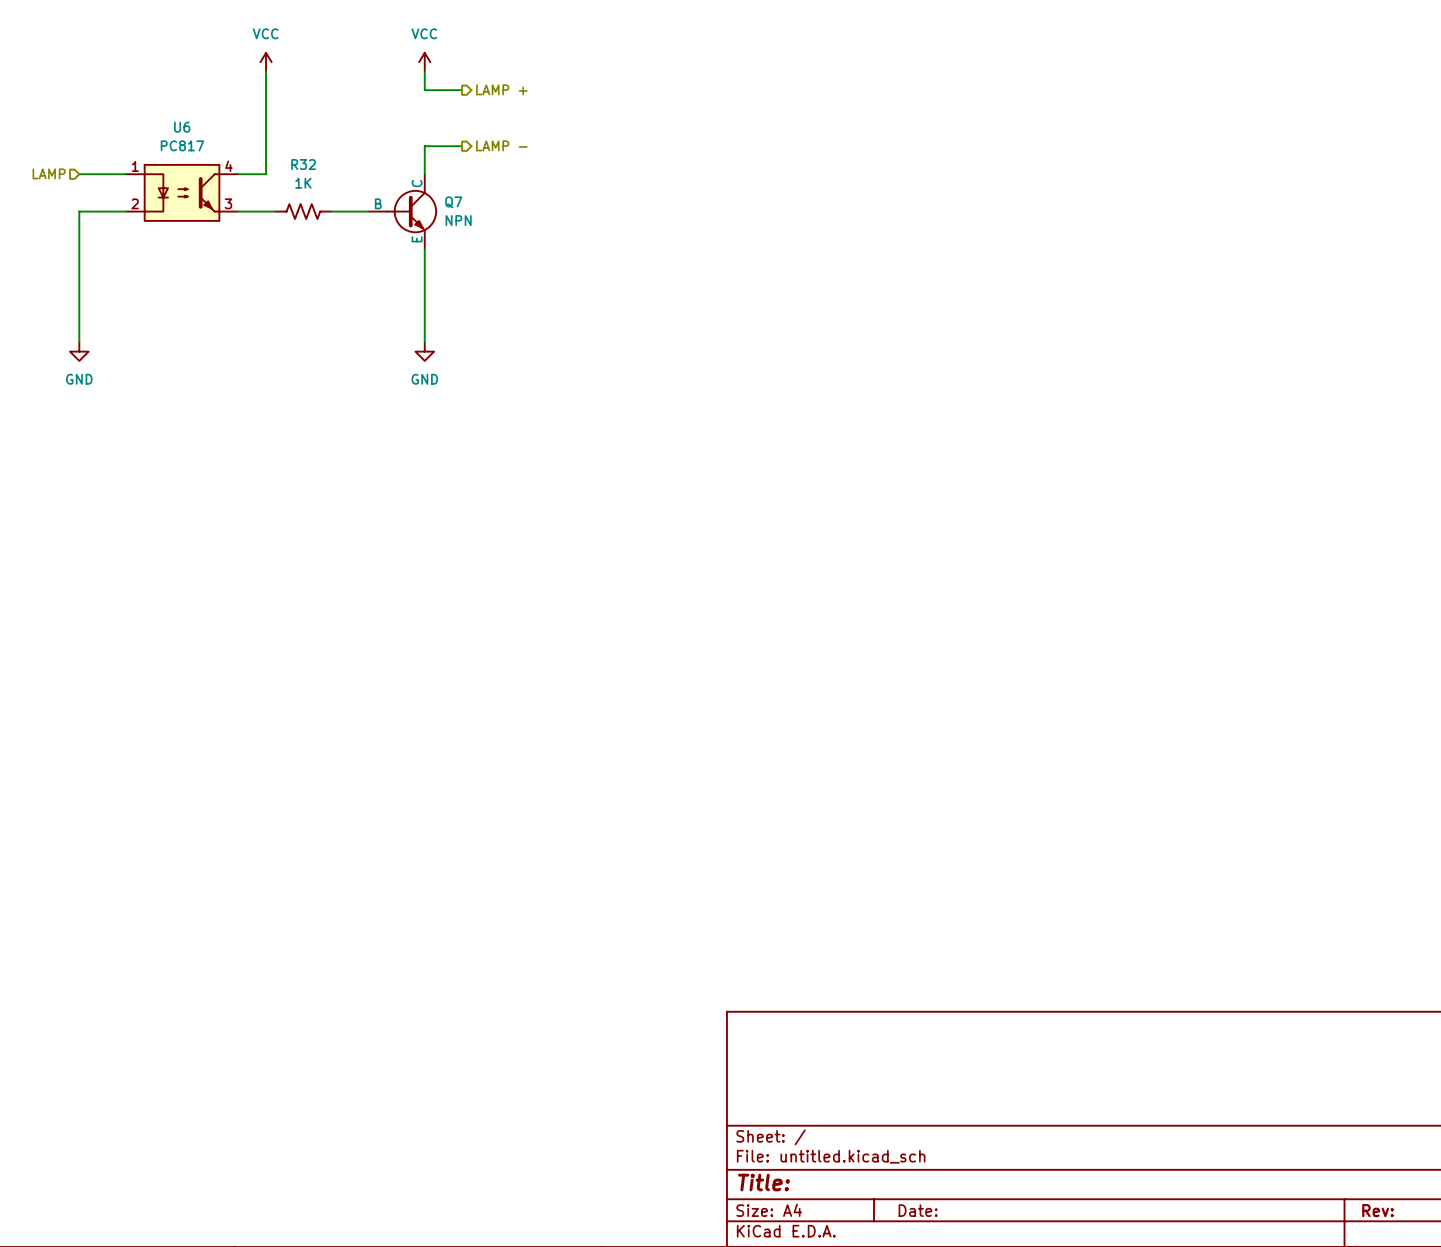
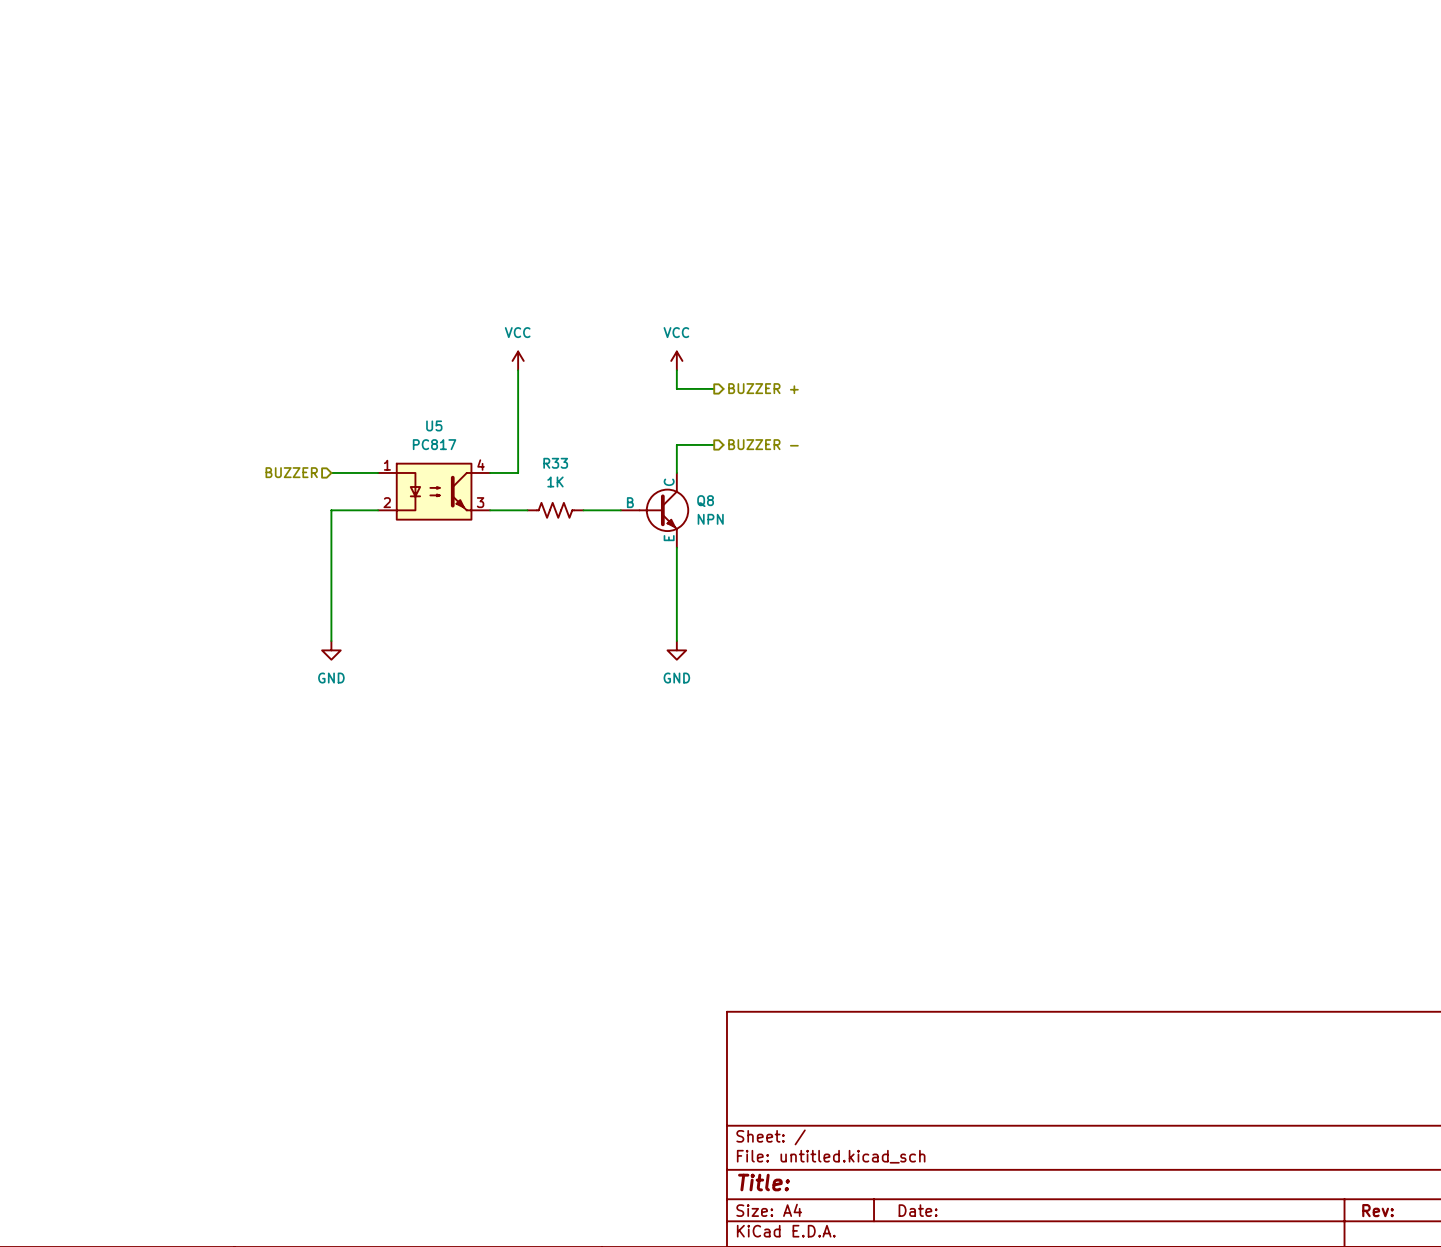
power symbol: VCC (266, 62) -> none
power symbol: VCC (424, 62) -> none
wire: (266, 71) (266, 174) (238, 174) -> none
wire: (424, 71) (424, 90) (462, 90) -> none
hierarchical label: LAMP + (501, 89) -> none
hierarchical label: LAMP - (501, 145) -> none
wire: (462, 146) (424, 146) (424, 174) -> none
hierarchical label: LAMP (49, 173) -> none
wire: (79, 174) (126, 174) -> none
U6: PC817 (182, 192) -> none
wire: (126, 211) (79, 211) (79, 342) -> none
wire: (238, 211) (275, 211) -> none
R32: 1K (303, 211) -> none
wire: (331, 211) (368, 211) -> none
Q7: NPN (402, 211) -> none
wire: (424, 248) (424, 342) -> none
power symbol: GND (79, 351) -> none
power symbol: GND (424, 351) -> none
power symbol: none -> VCC (518, 360)
power symbol: none -> VCC (676, 360)
wire: none -> (518, 370) (518, 472) (490, 472)
wire: none -> (676, 370) (676, 388) (714, 388)
hierarchical label: none -> BUZZER + (763, 388)
wire: none -> (714, 444) (676, 444) (676, 472)
hierarchical label: none -> BUZZER - (763, 444)
hierarchical label: none -> BUZZER (291, 472)
wire: none -> (331, 472) (378, 472)
U5: none -> PC817 (434, 491)
wire: none -> (378, 510) (331, 510) (331, 641)
wire: none -> (490, 510) (527, 510)
R33: none -> 1K (555, 510)
wire: none -> (583, 510) (620, 510)
Q8: none -> NPN (655, 510)
wire: none -> (676, 547) (676, 641)
power symbol: none -> GND (331, 650)
power symbol: none -> GND (676, 650)

